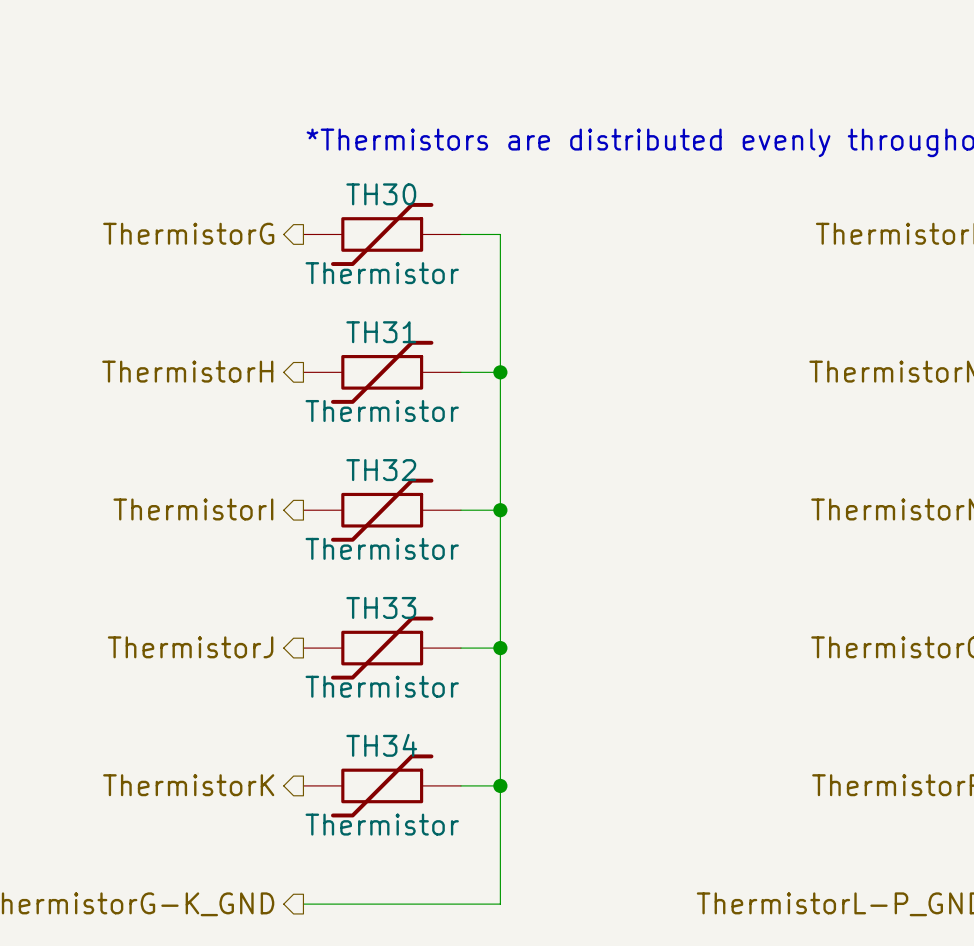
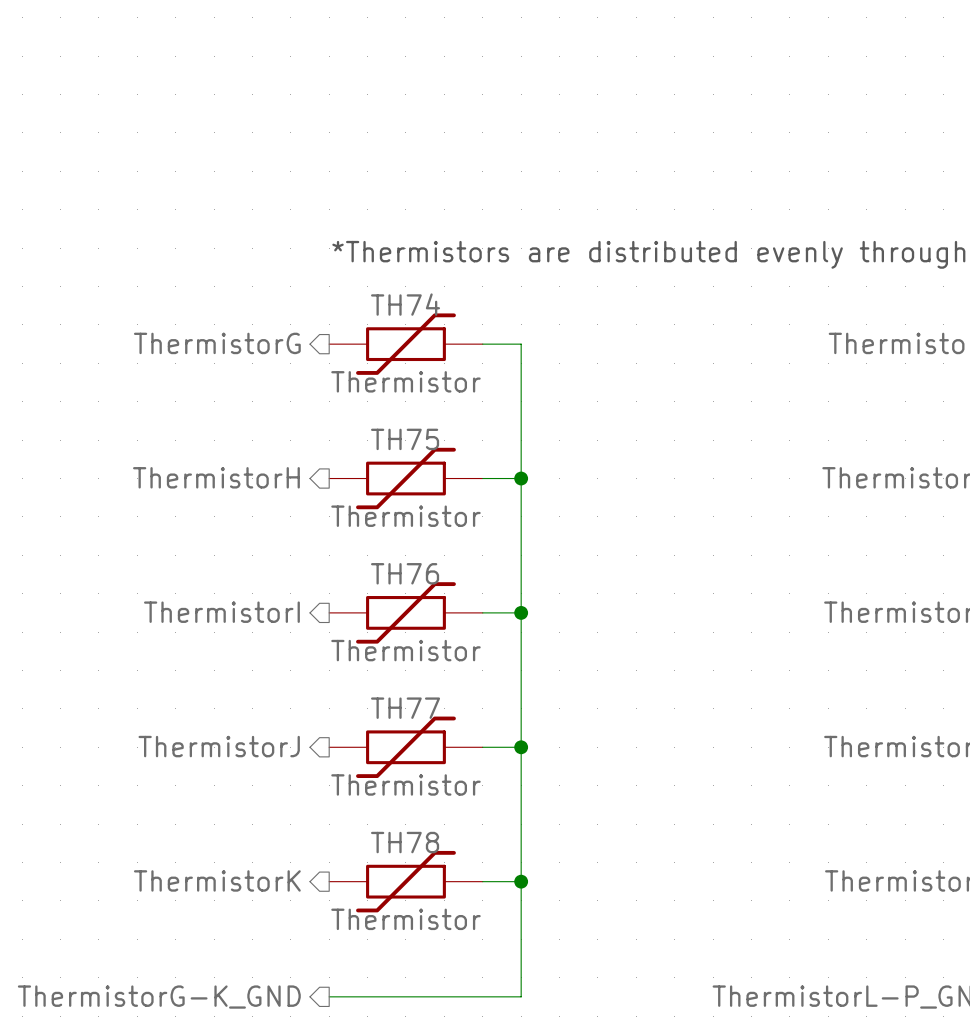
TH30 name: TH30 (381, 194) -> TH74 (405, 304)
TH31 name: TH31 (381, 332) -> TH75 (405, 439)
TH32 name: TH32 (381, 470) -> TH76 (405, 573)
TH33 name: TH33 (381, 607) -> TH77 (405, 708)
TH34 name: TH34 (381, 745) -> TH78 (405, 842)

